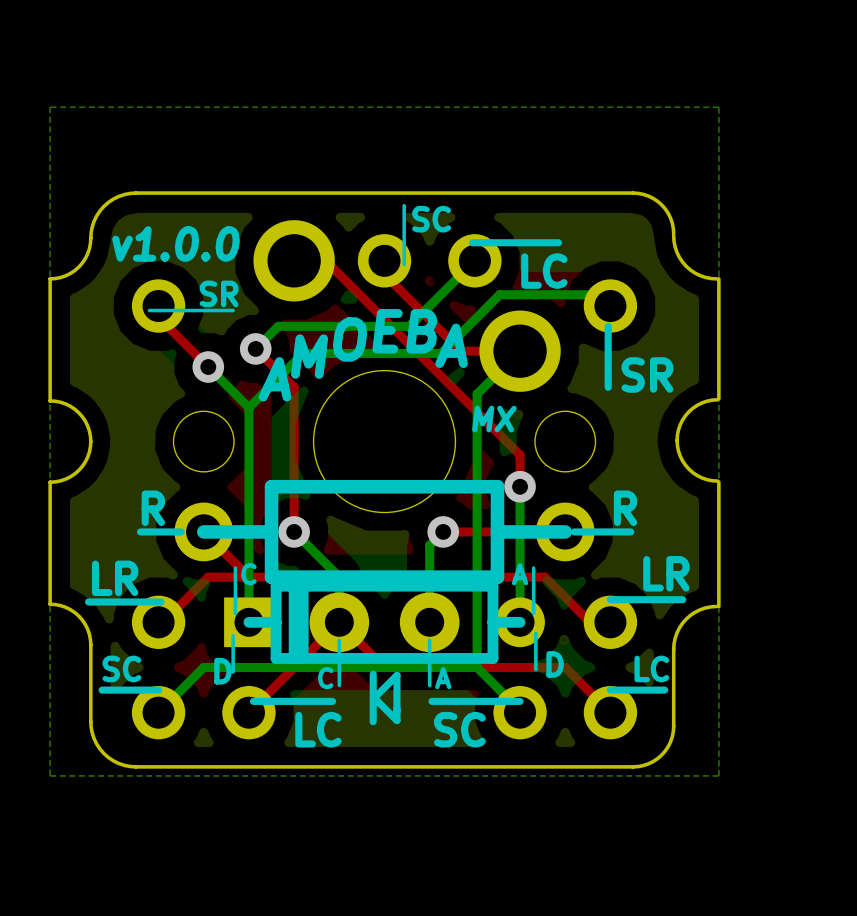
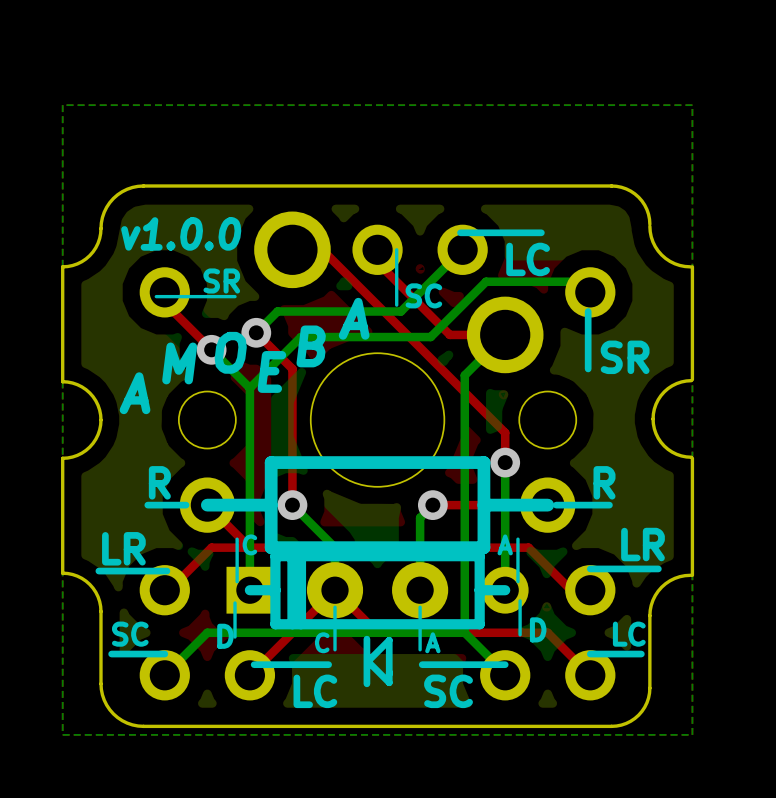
line: (404, 205) (404, 264) -> (396, 249) (396, 305)
text position: SC (431, 219) -> SC (423, 295)
text: E (387, 331) -> none
text: B (421, 331) -> none
text position: O (350, 339) -> O (230, 352)
text position: A (451, 345) -> A (354, 318)
text: M (309, 356) -> B (311, 346)
text: A (275, 379) -> E (271, 371)
text: none -> M (179, 363)
text: none -> A (135, 393)
text: MX (494, 419) -> none

